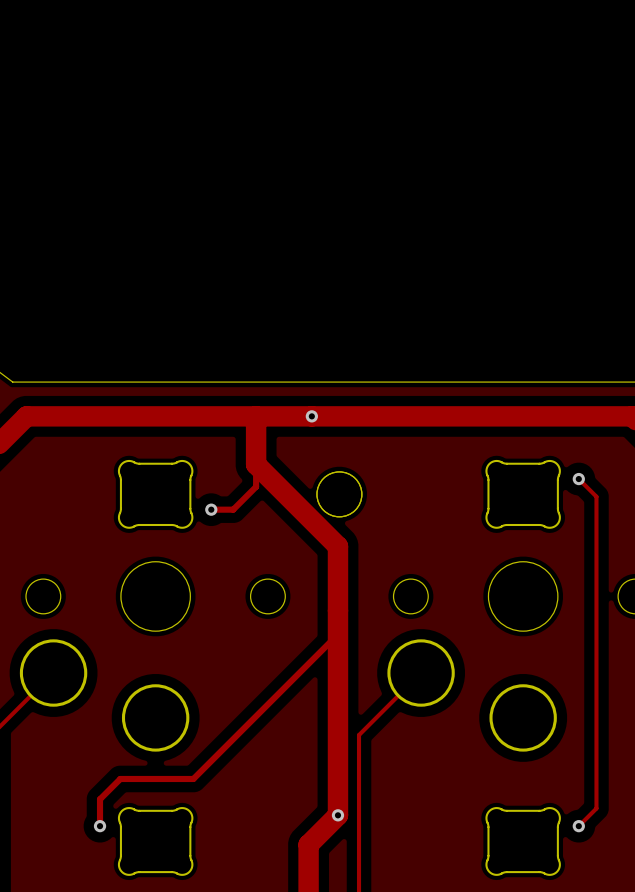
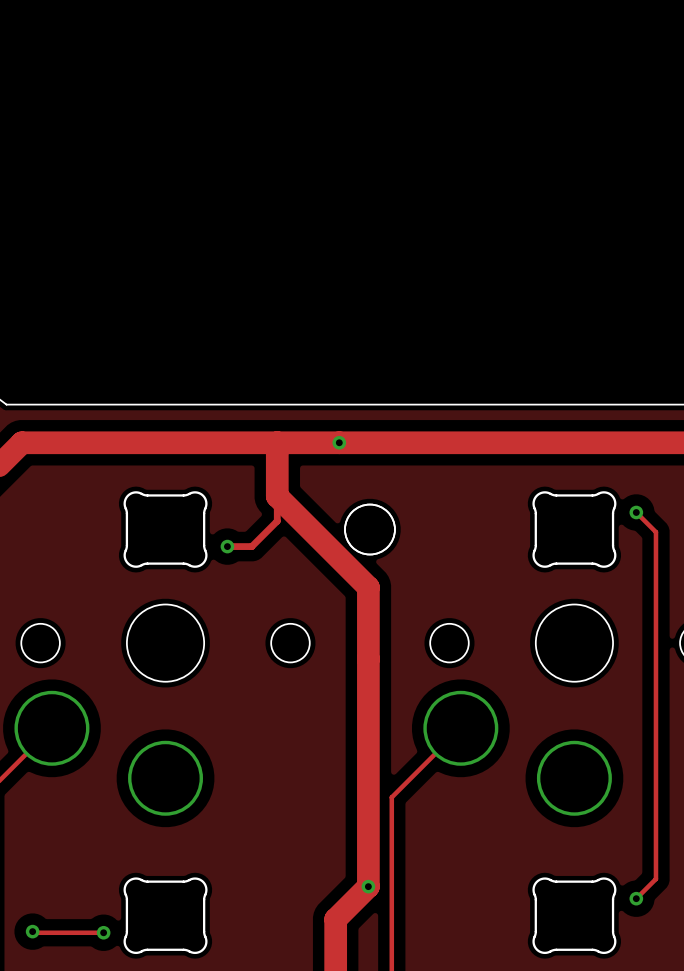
track: (337, 634) (193, 778) (120, 778) (100, 799) (100, 826) -> none
via position: (100, 826) -> (103, 932)
via: none -> (32, 931)
track: none -> (31, 932) (103, 932)

